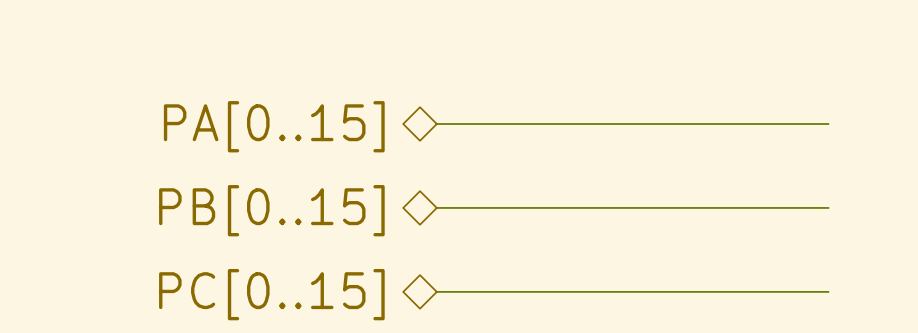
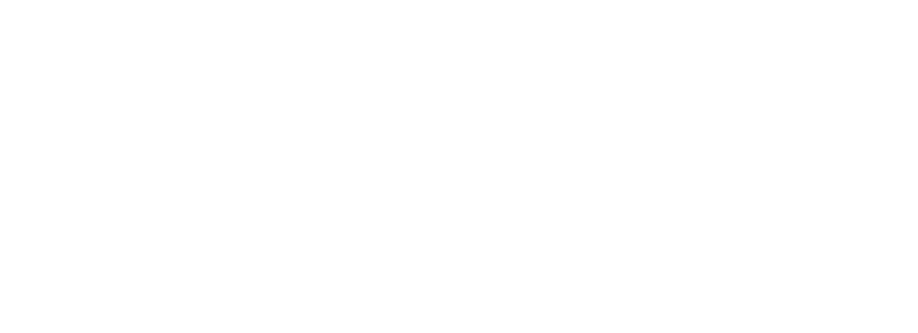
wire: (436, 124) (828, 124) -> none
hierarchical label: PA[0..15] (274, 126) -> none
wire: (436, 207) (828, 207) -> none
hierarchical label: PB[0..15] (271, 210) -> none
wire: (436, 291) (828, 291) -> none
hierarchical label: PC[0..15] (271, 294) -> none

